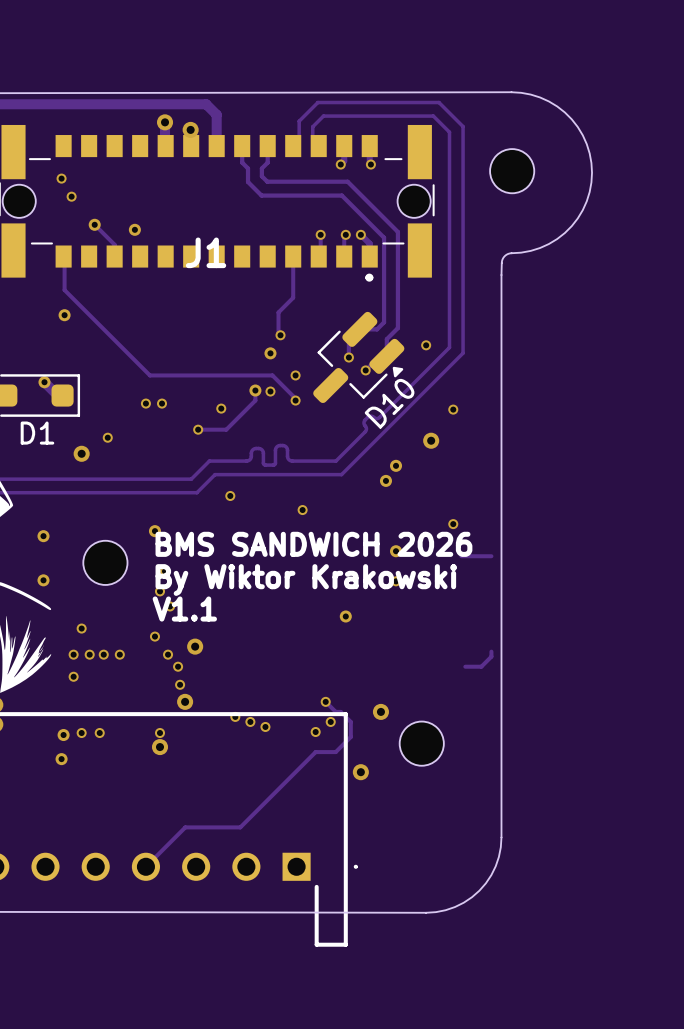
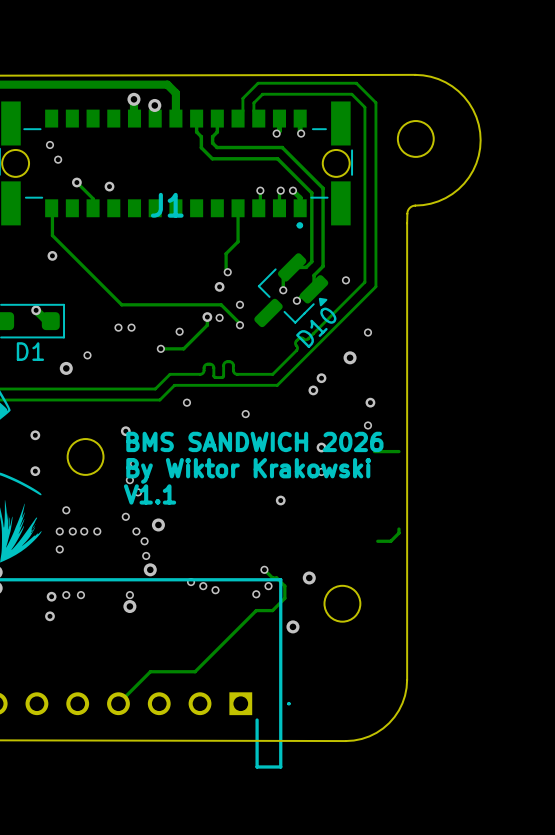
via: none -> (370, 402)

